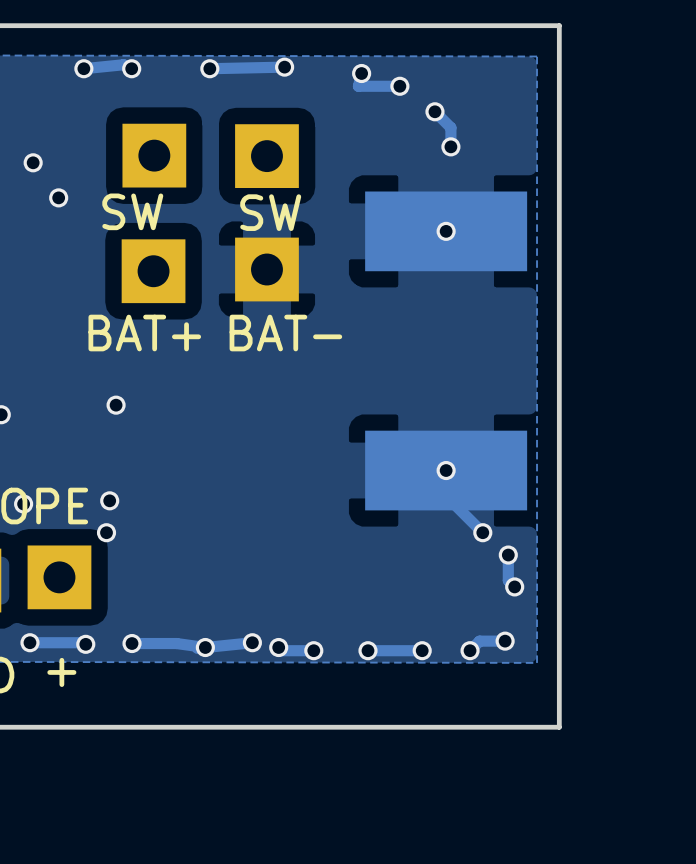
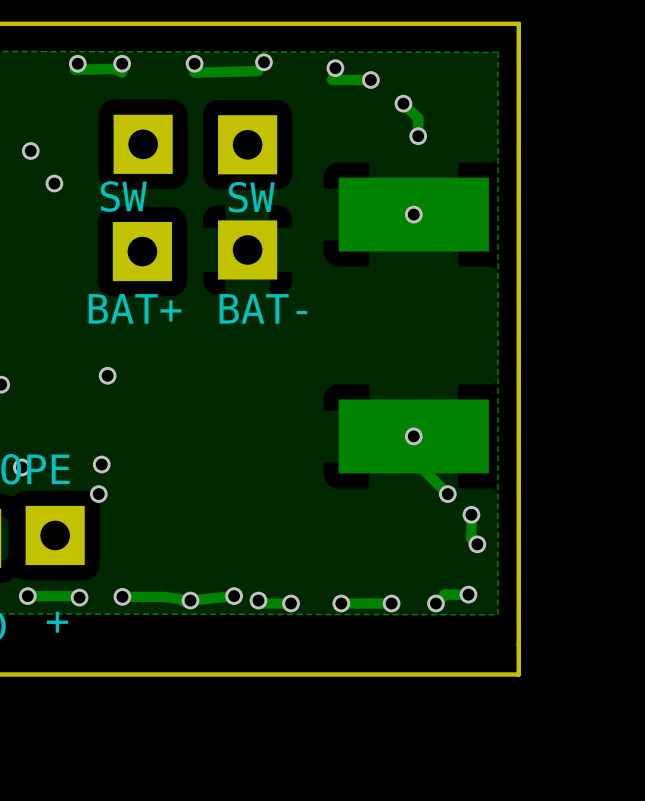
track: (284, 67) (209, 68) -> none
track: (131, 68) (123, 64) (83, 68) -> none
track: none -> (74, 69) (114, 68) (122, 72)
track: none -> (258, 71) (194, 72)

